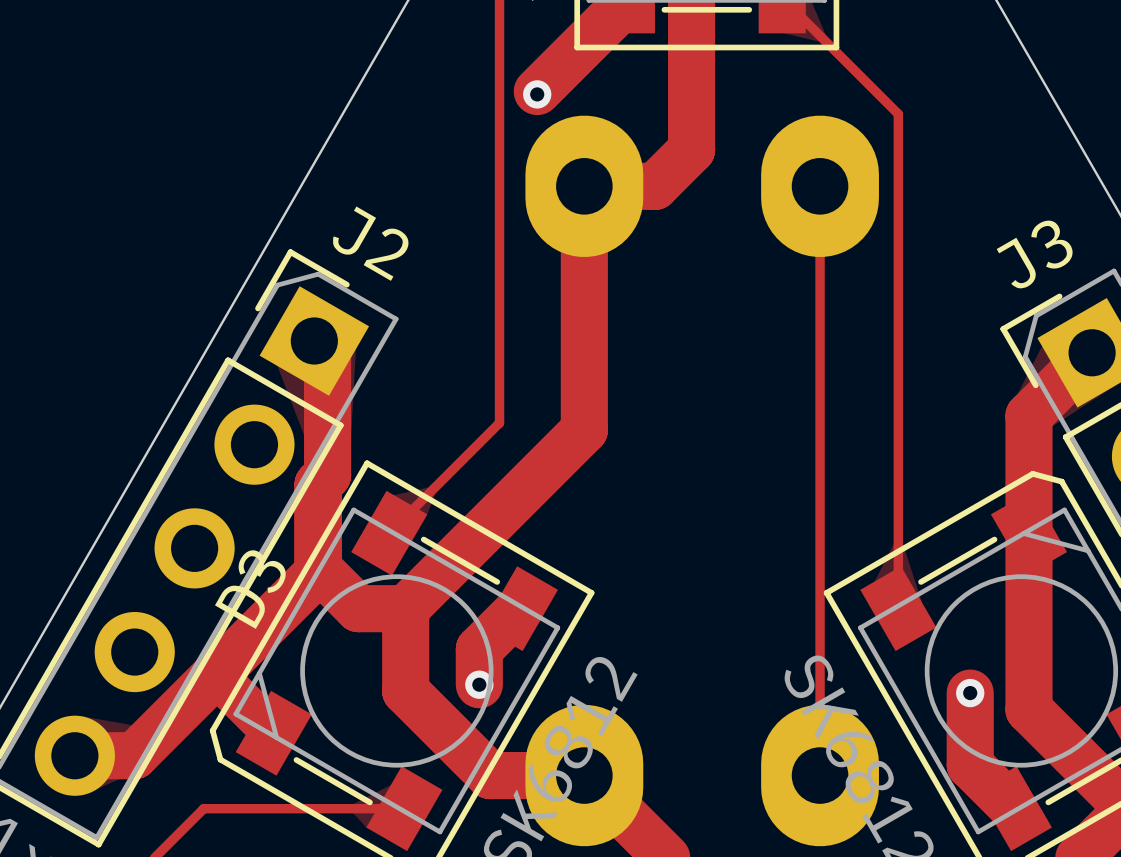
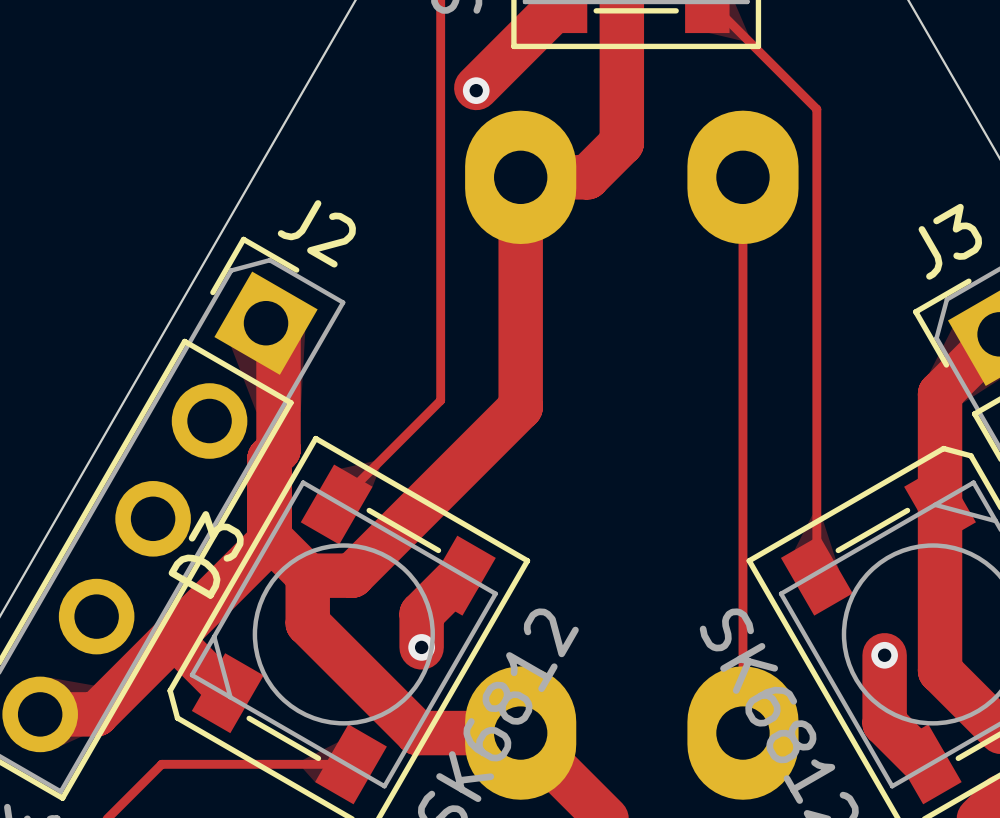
track: (405, 608) (405, 691) (490, 775) -> (307, 575) (307, 623) (417, 733) (431, 733)

